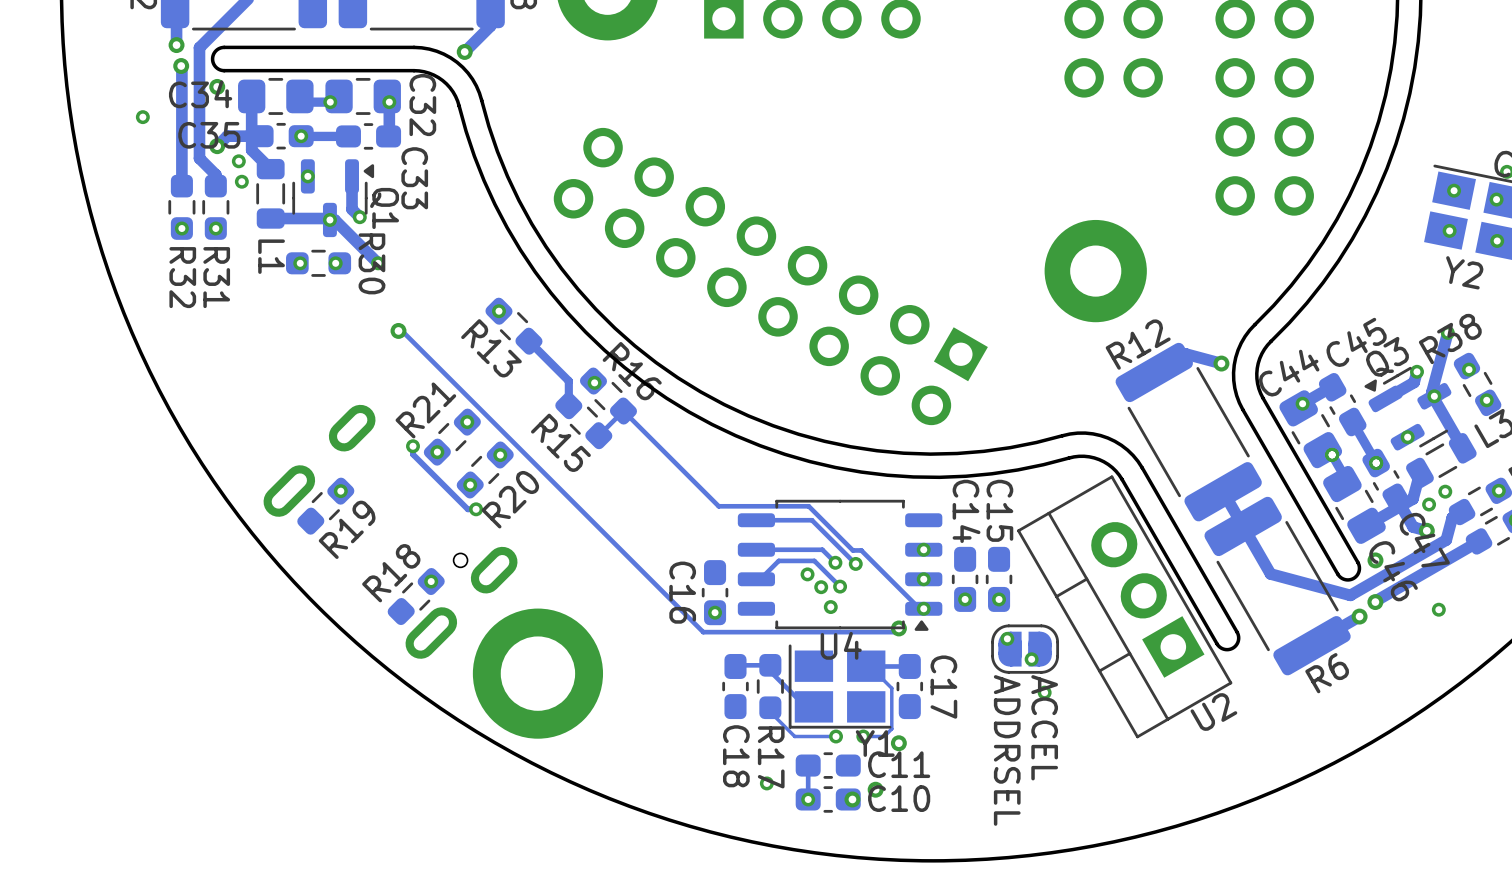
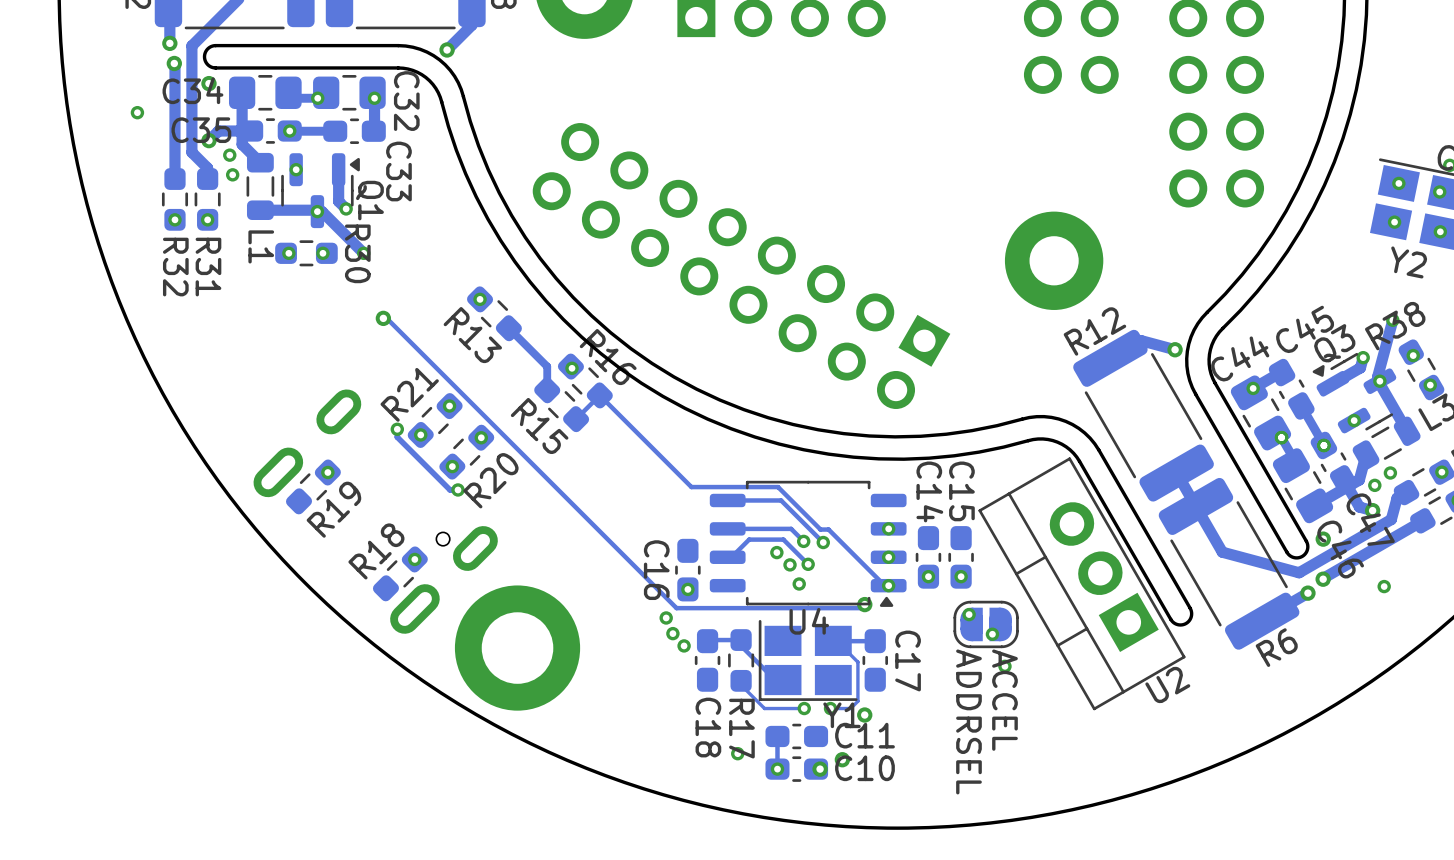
via: none -> (666, 617)
via: none -> (672, 633)
via: none -> (684, 645)

